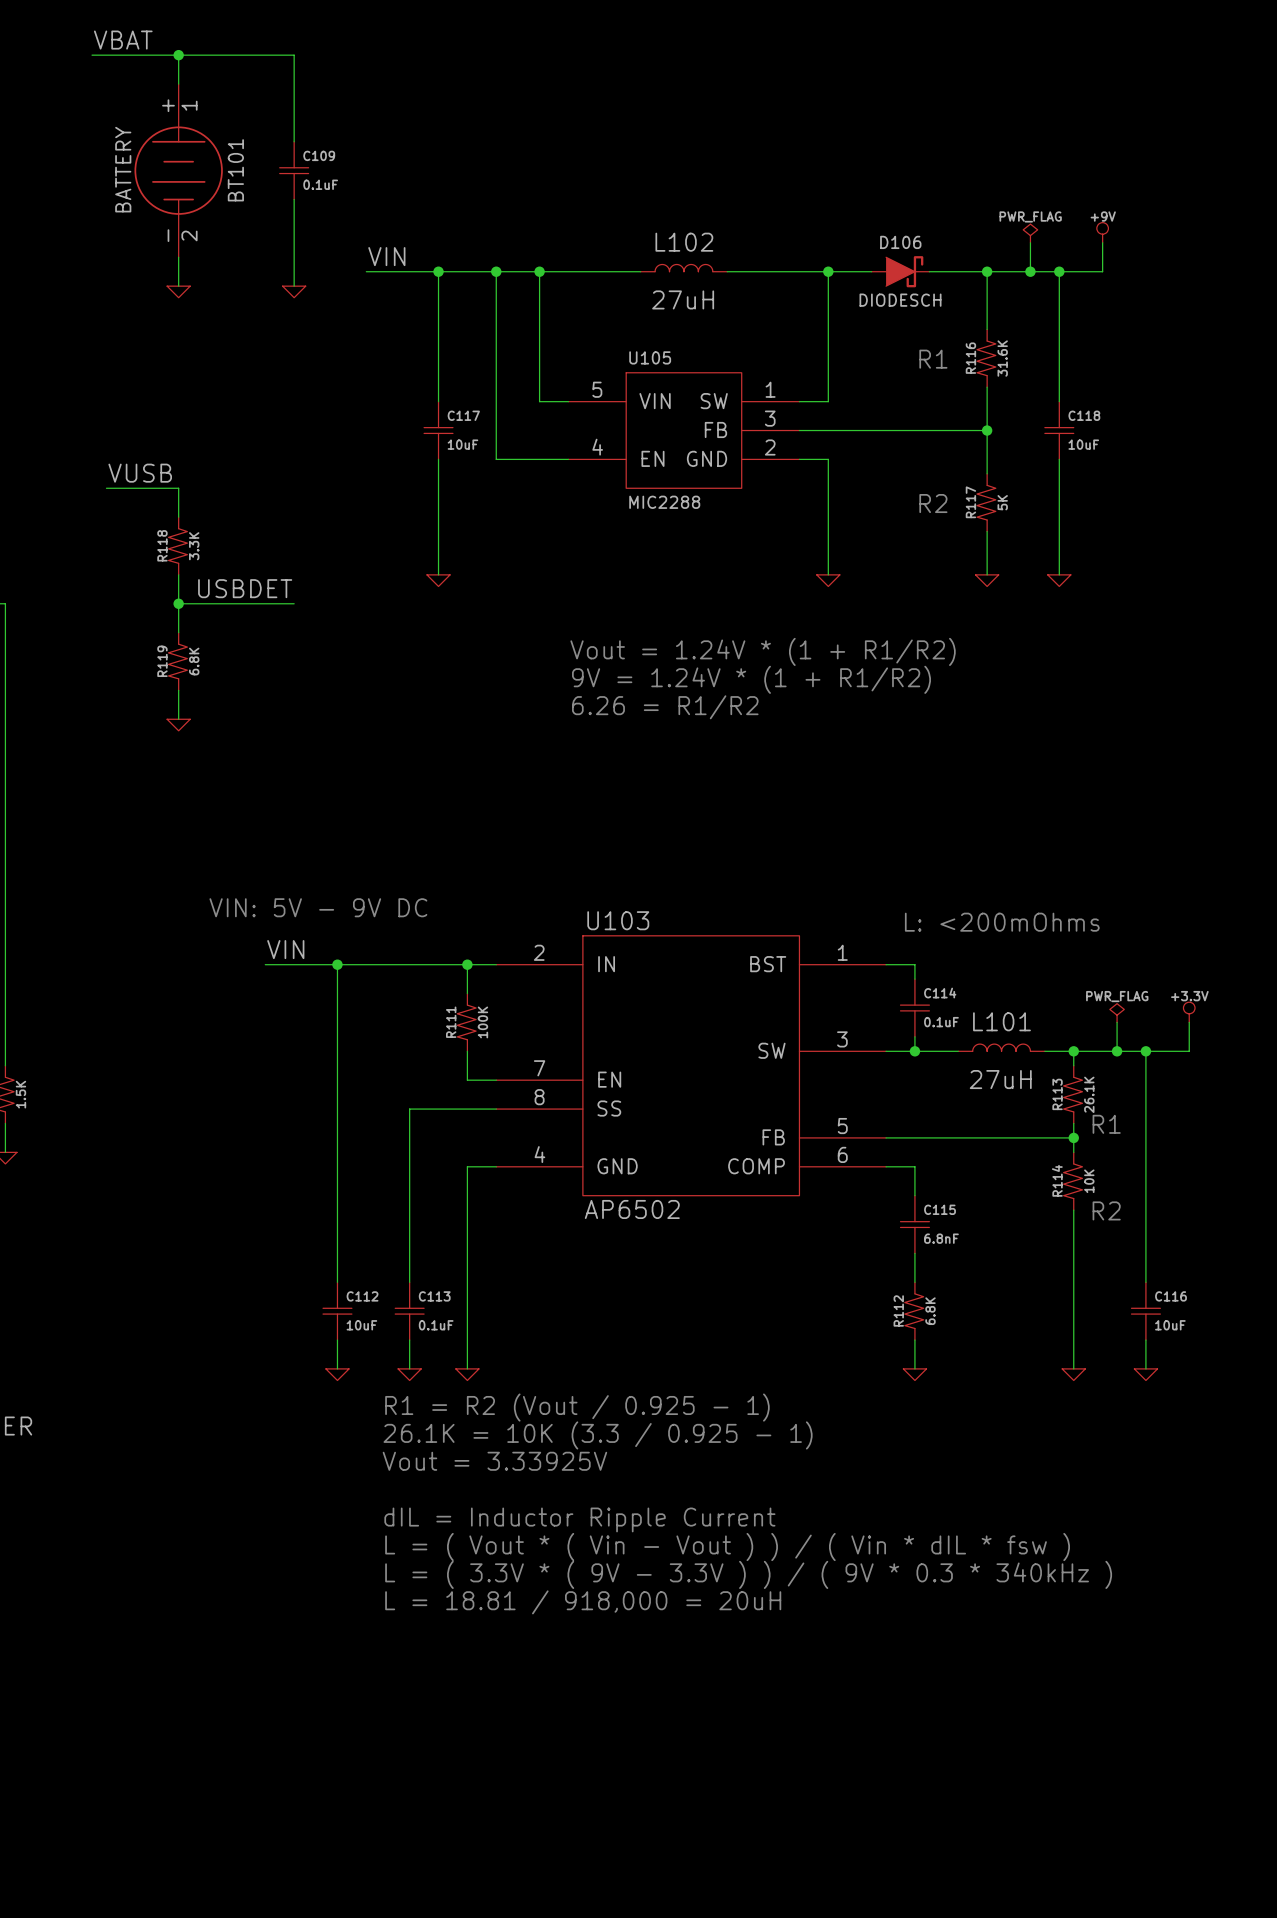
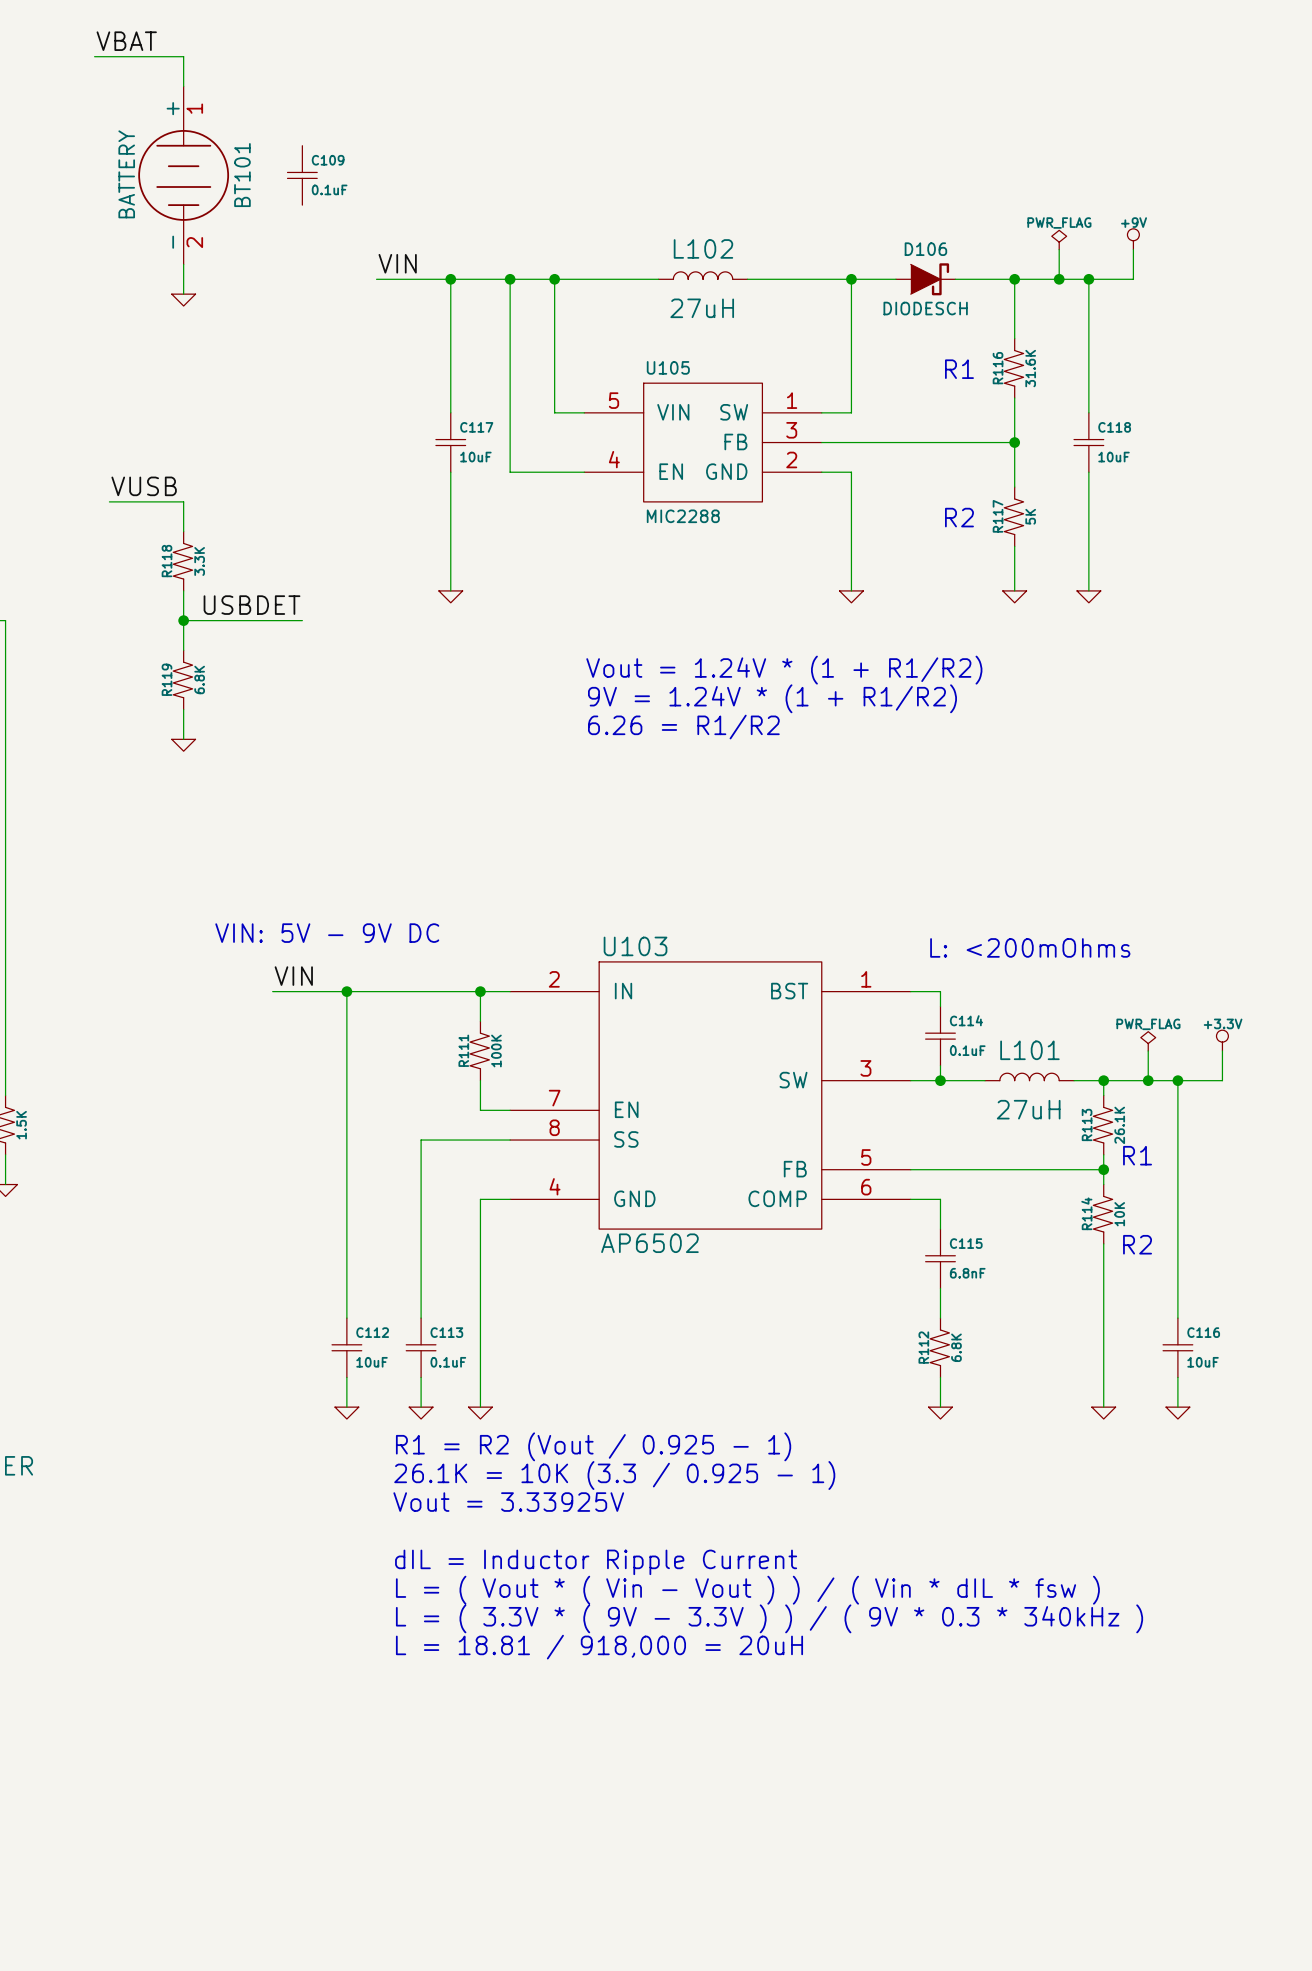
wire: (178, 55) (294, 55) (294, 141) -> none
junction: (178, 55) -> none
wire: (294, 199) (294, 286) -> none
power symbol: (294, 291) -> none

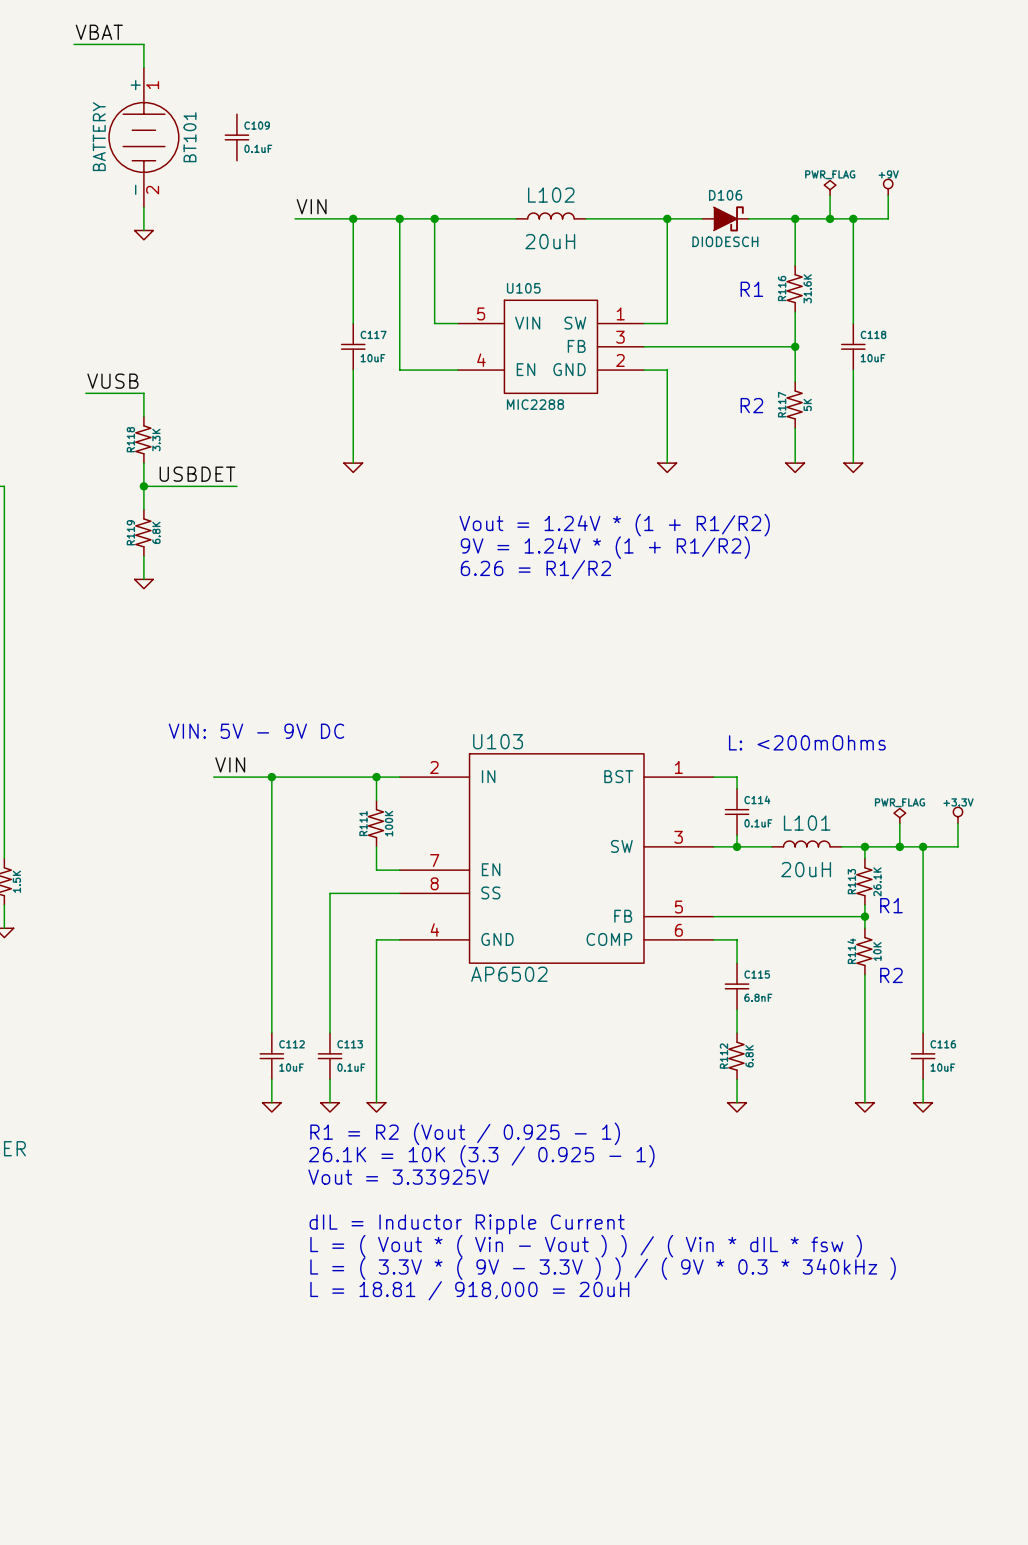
L102 value: 27uH (702, 308) -> 20uH (550, 241)
L101 value: 27uH (1028, 1109) -> 20uH (806, 869)

